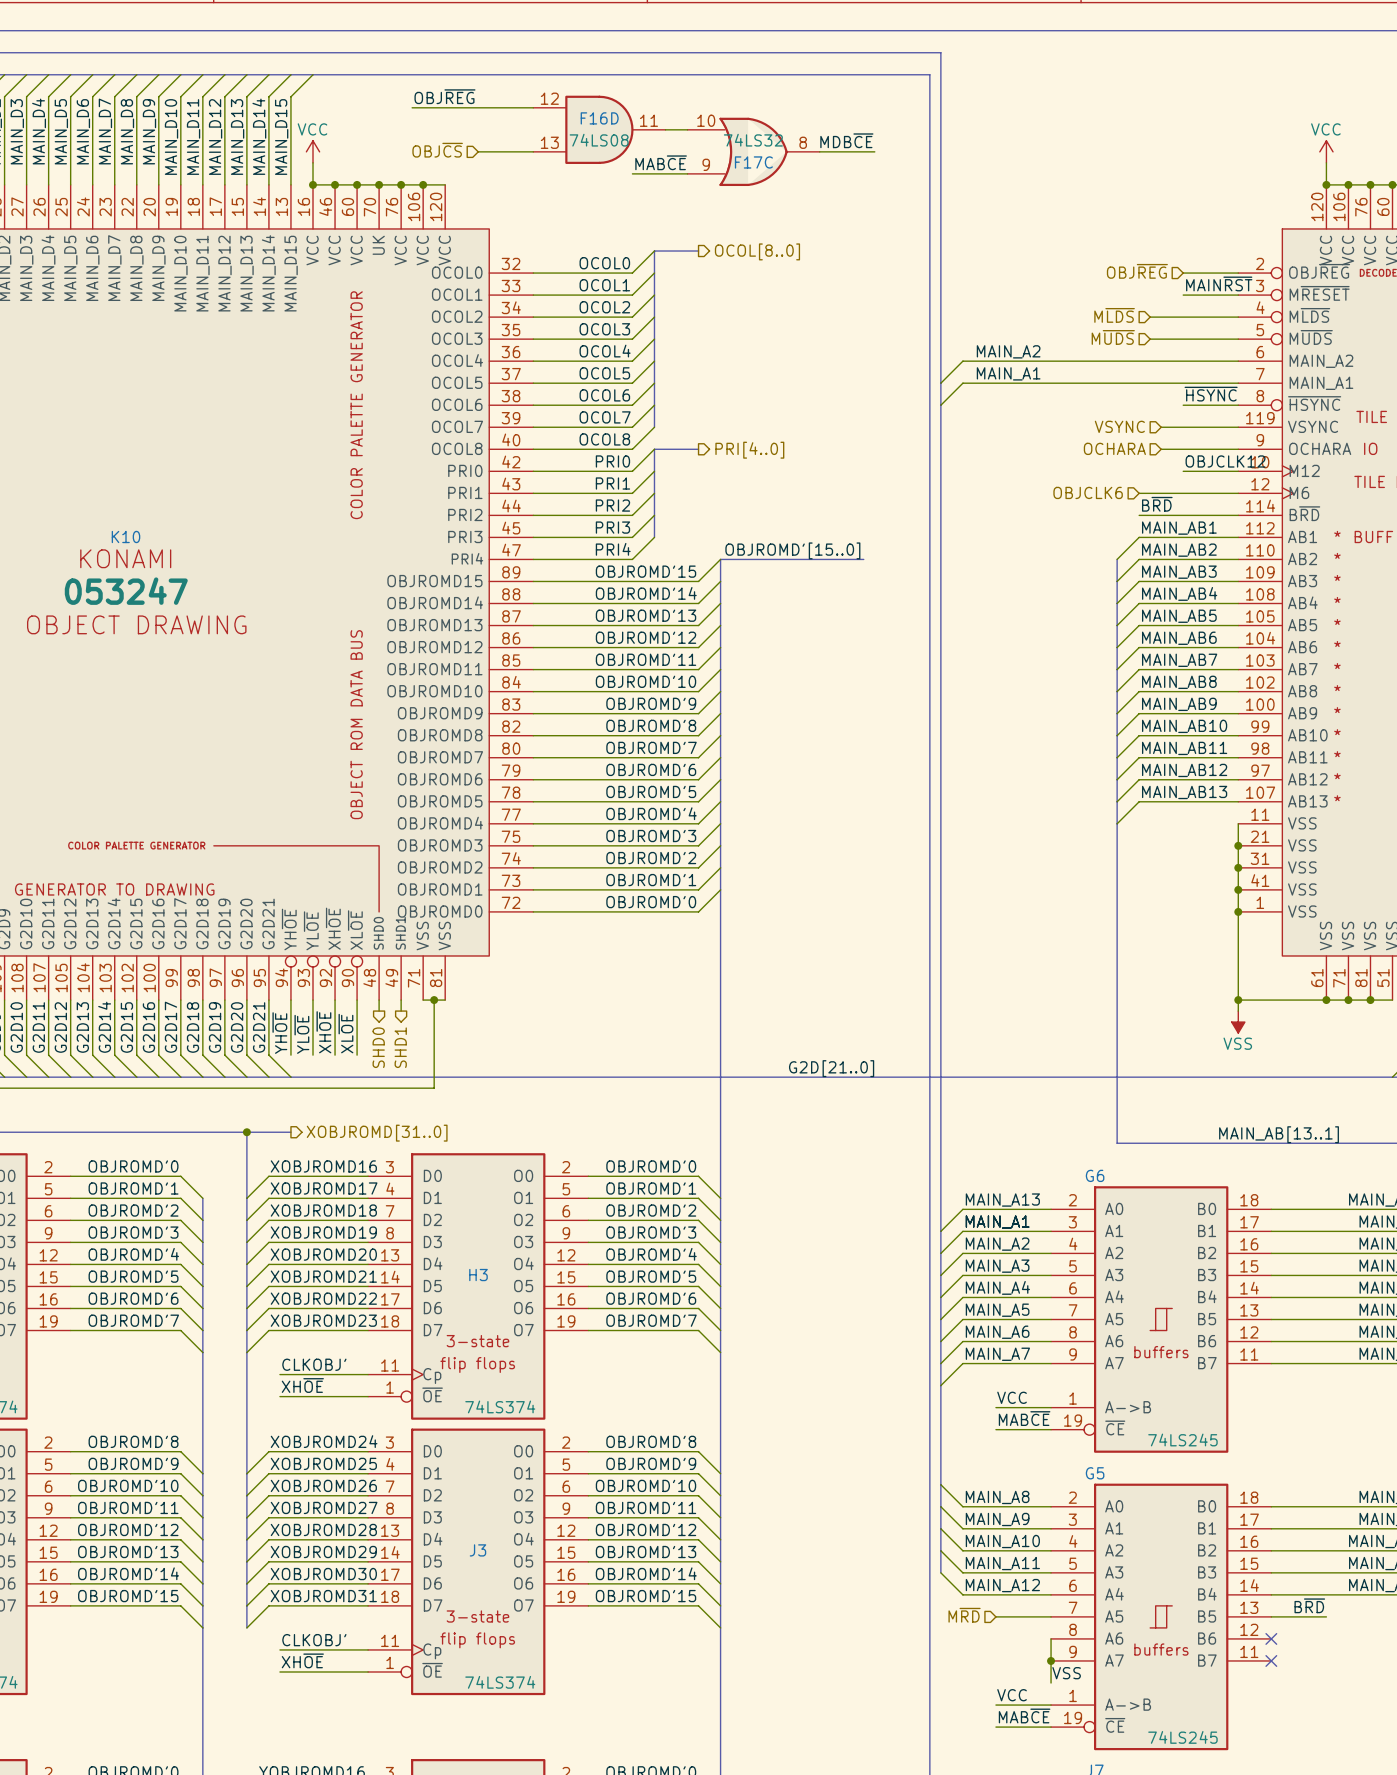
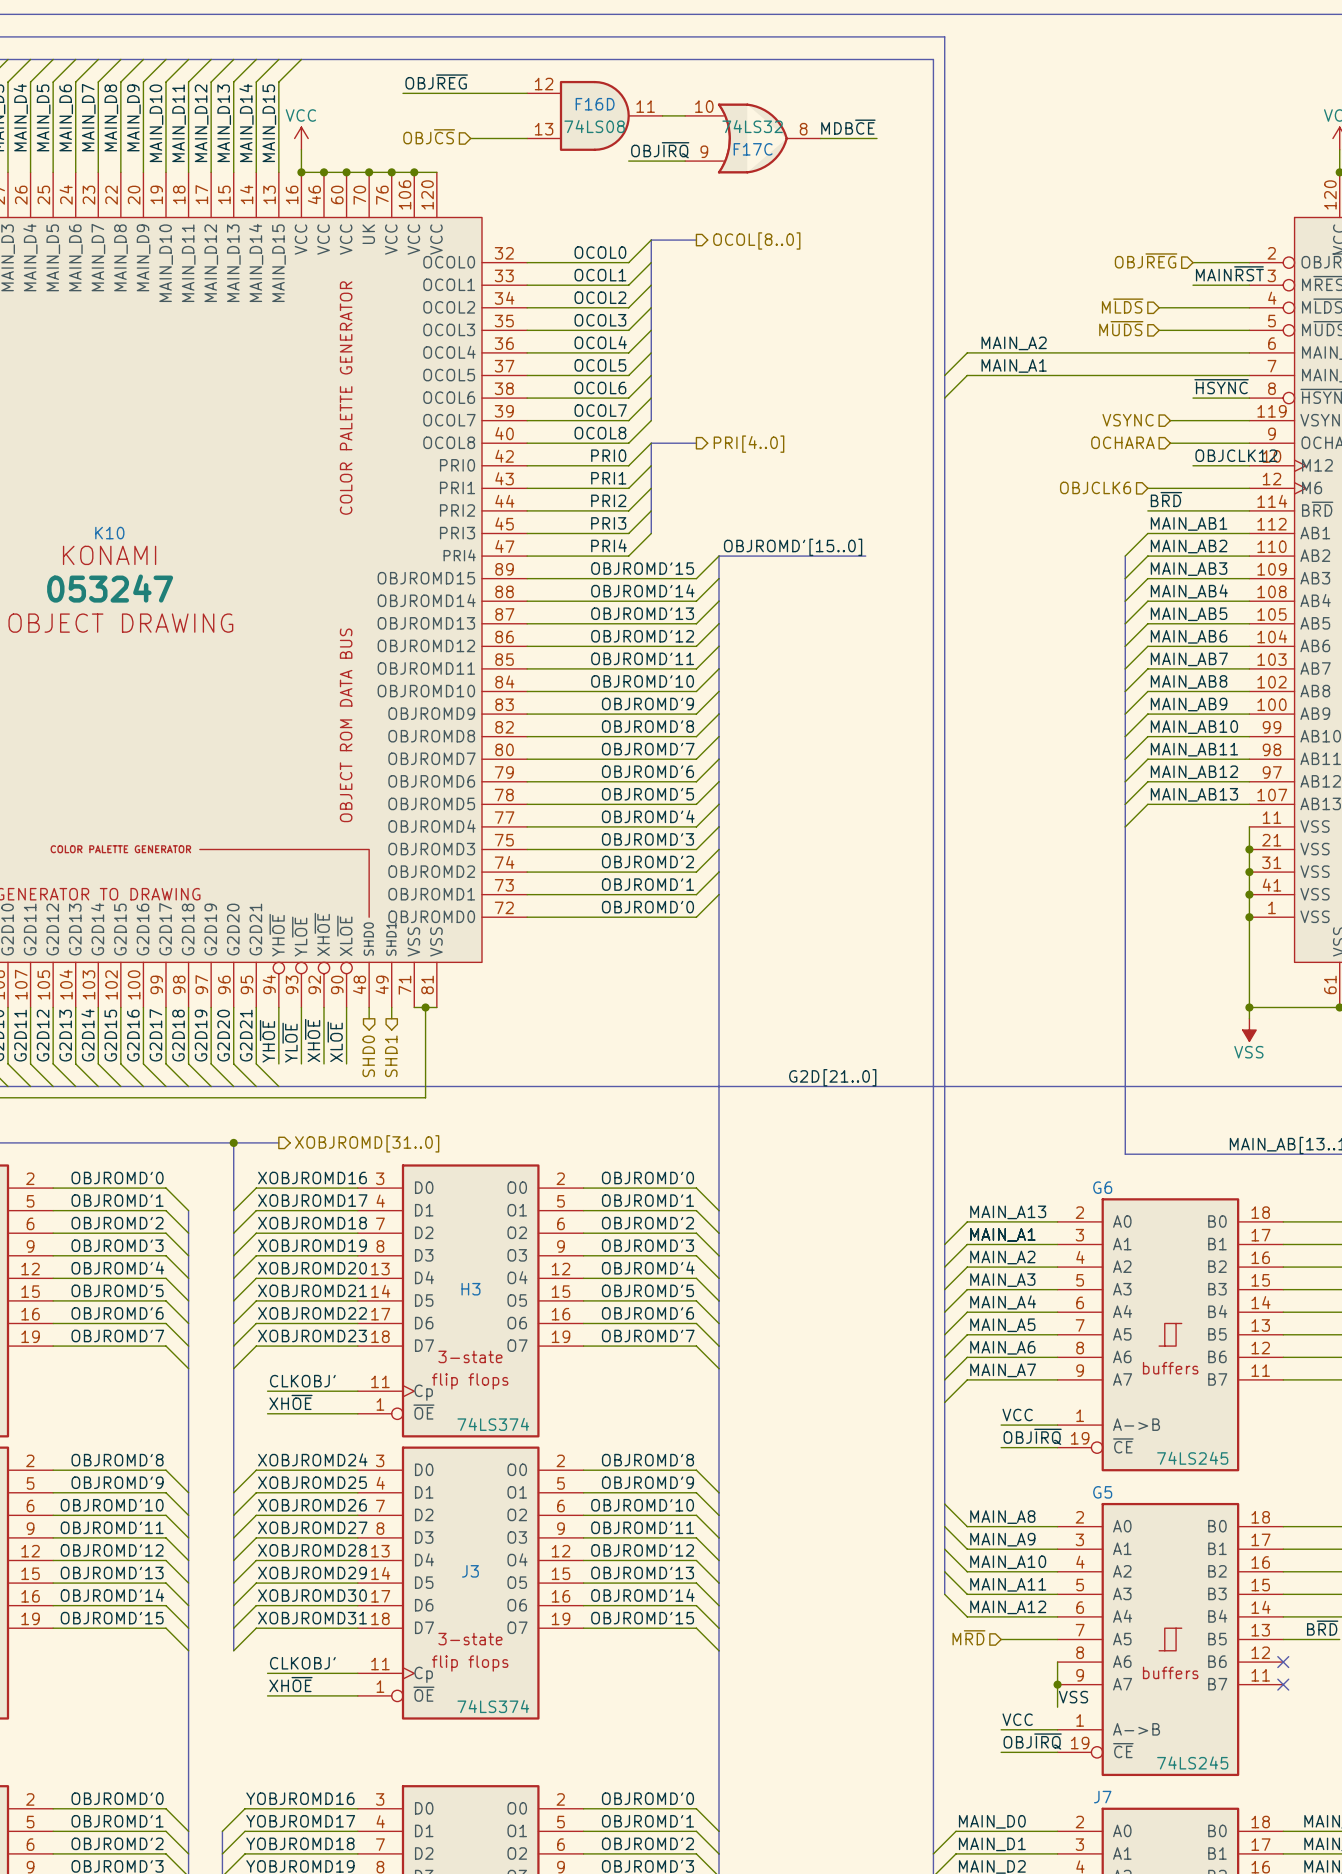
label: MAB~{CE} (661, 162) -> OBJ~{IRQ} (660, 150)
label: MAB~{CE} (1024, 1418) -> OBJ~{IRQ} (1032, 1436)
label: MAB~{CE} (1024, 1715) -> OBJ~{IRQ} (1032, 1741)

